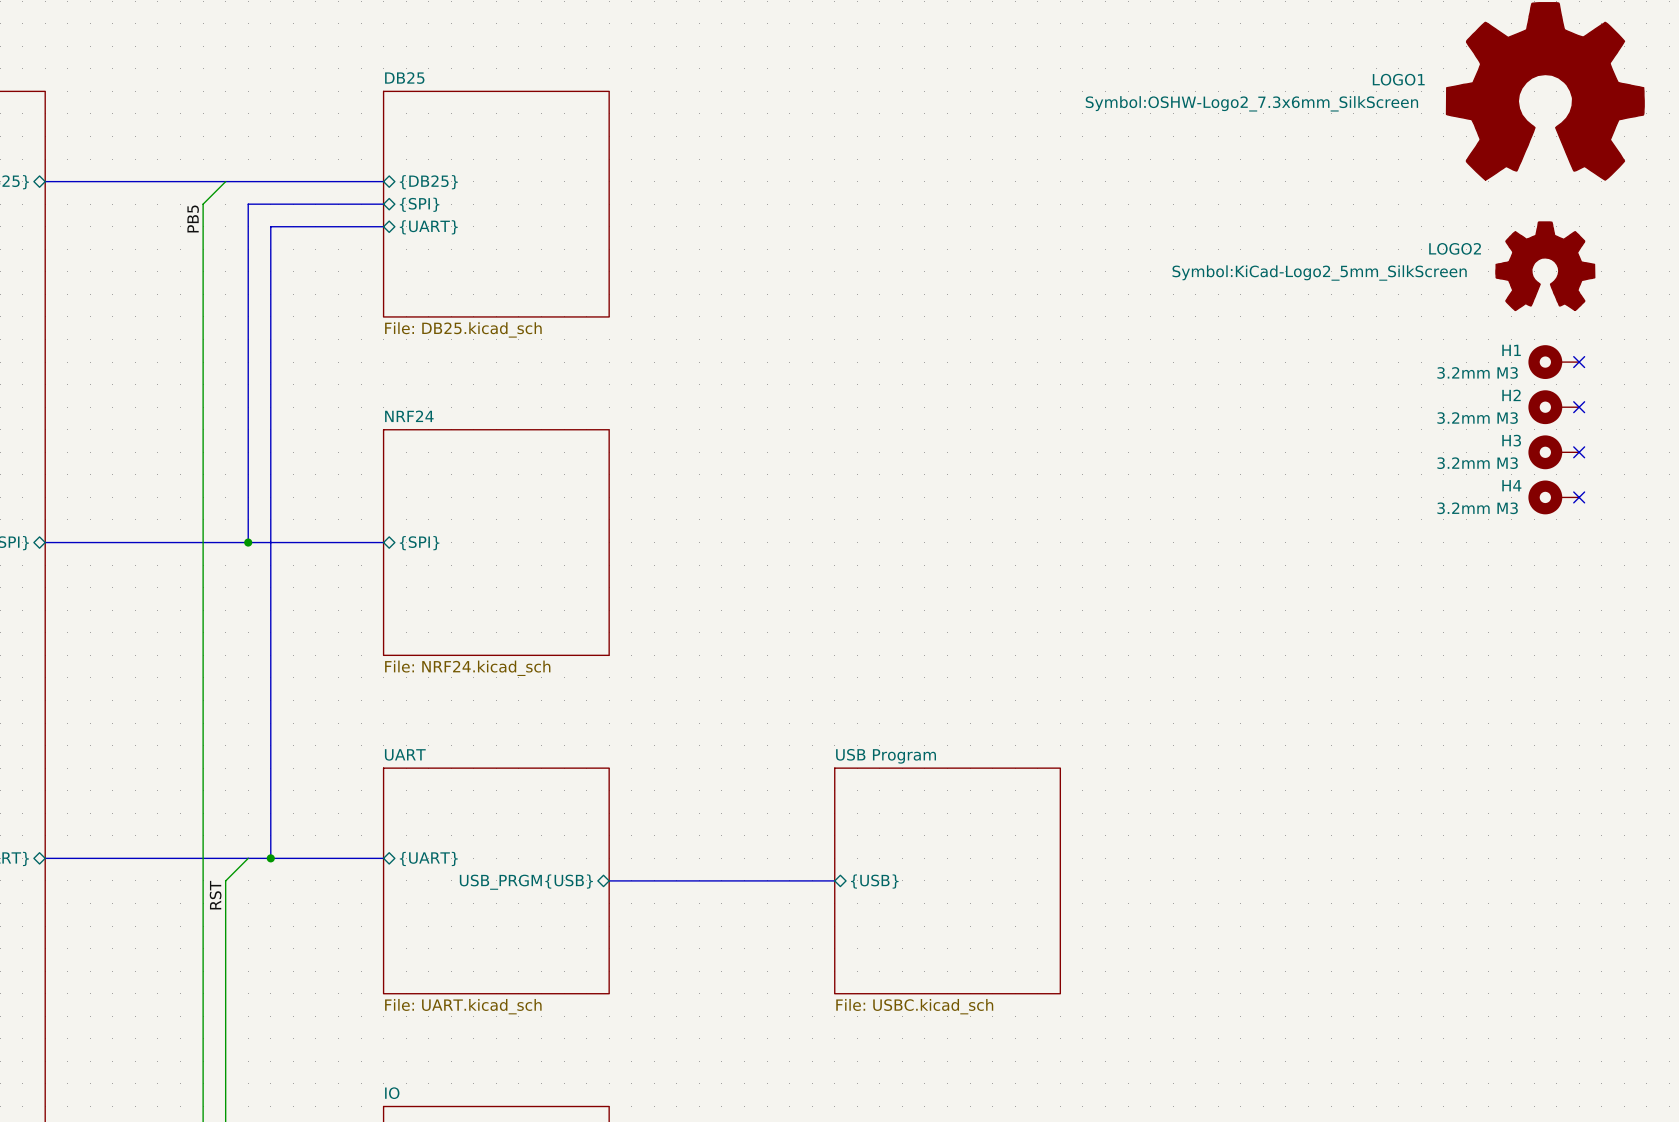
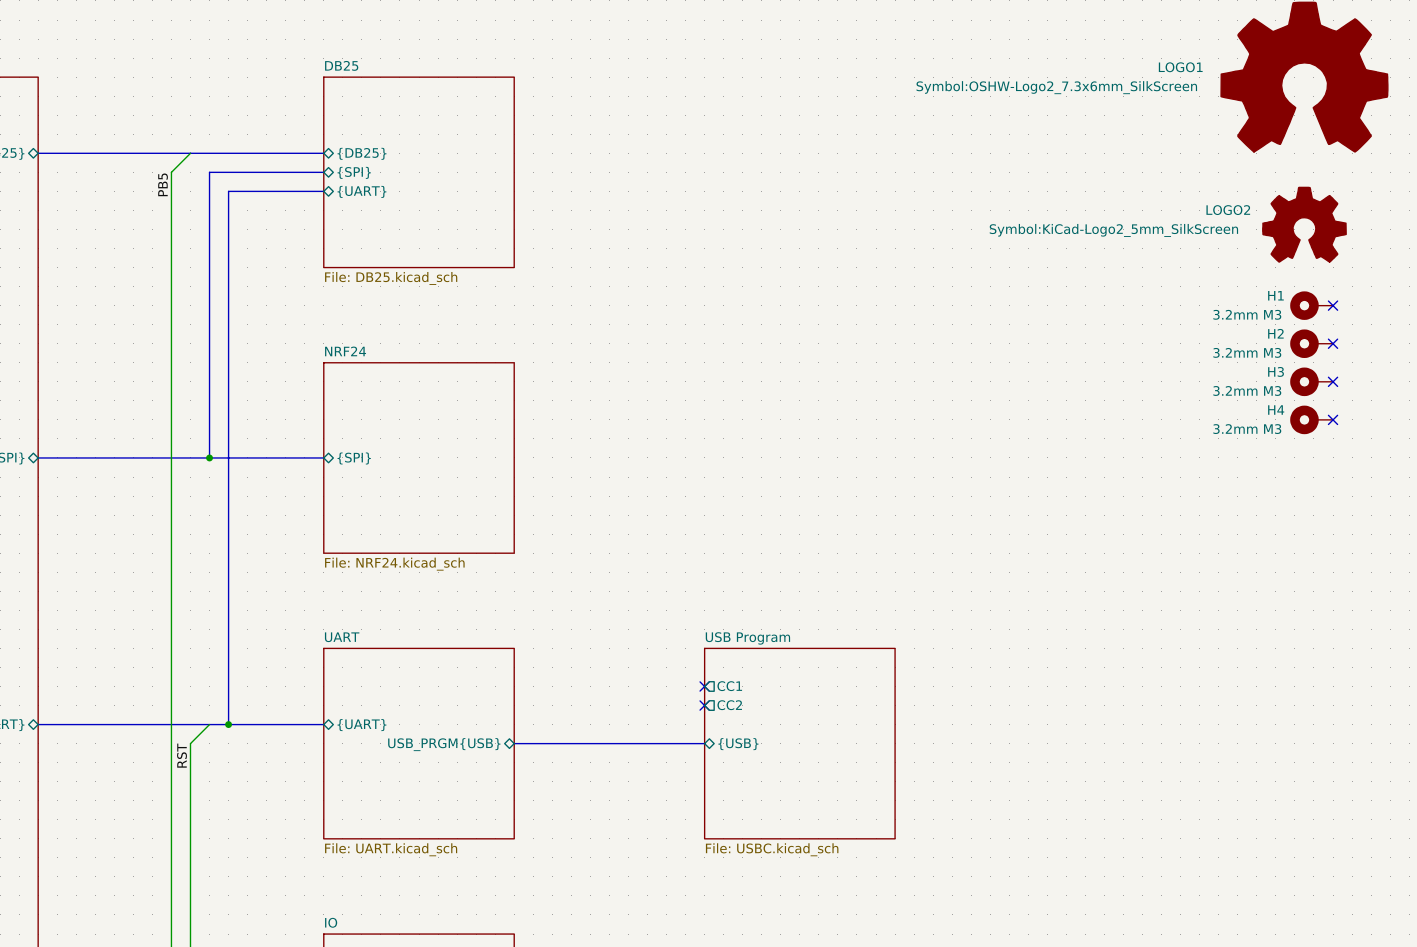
sheet pin: none -> CC1 (729, 686)
no-connect mark: none -> (704, 686)
no-connect mark: none -> (704, 705)
sheet pin: none -> CC2 (729, 705)

